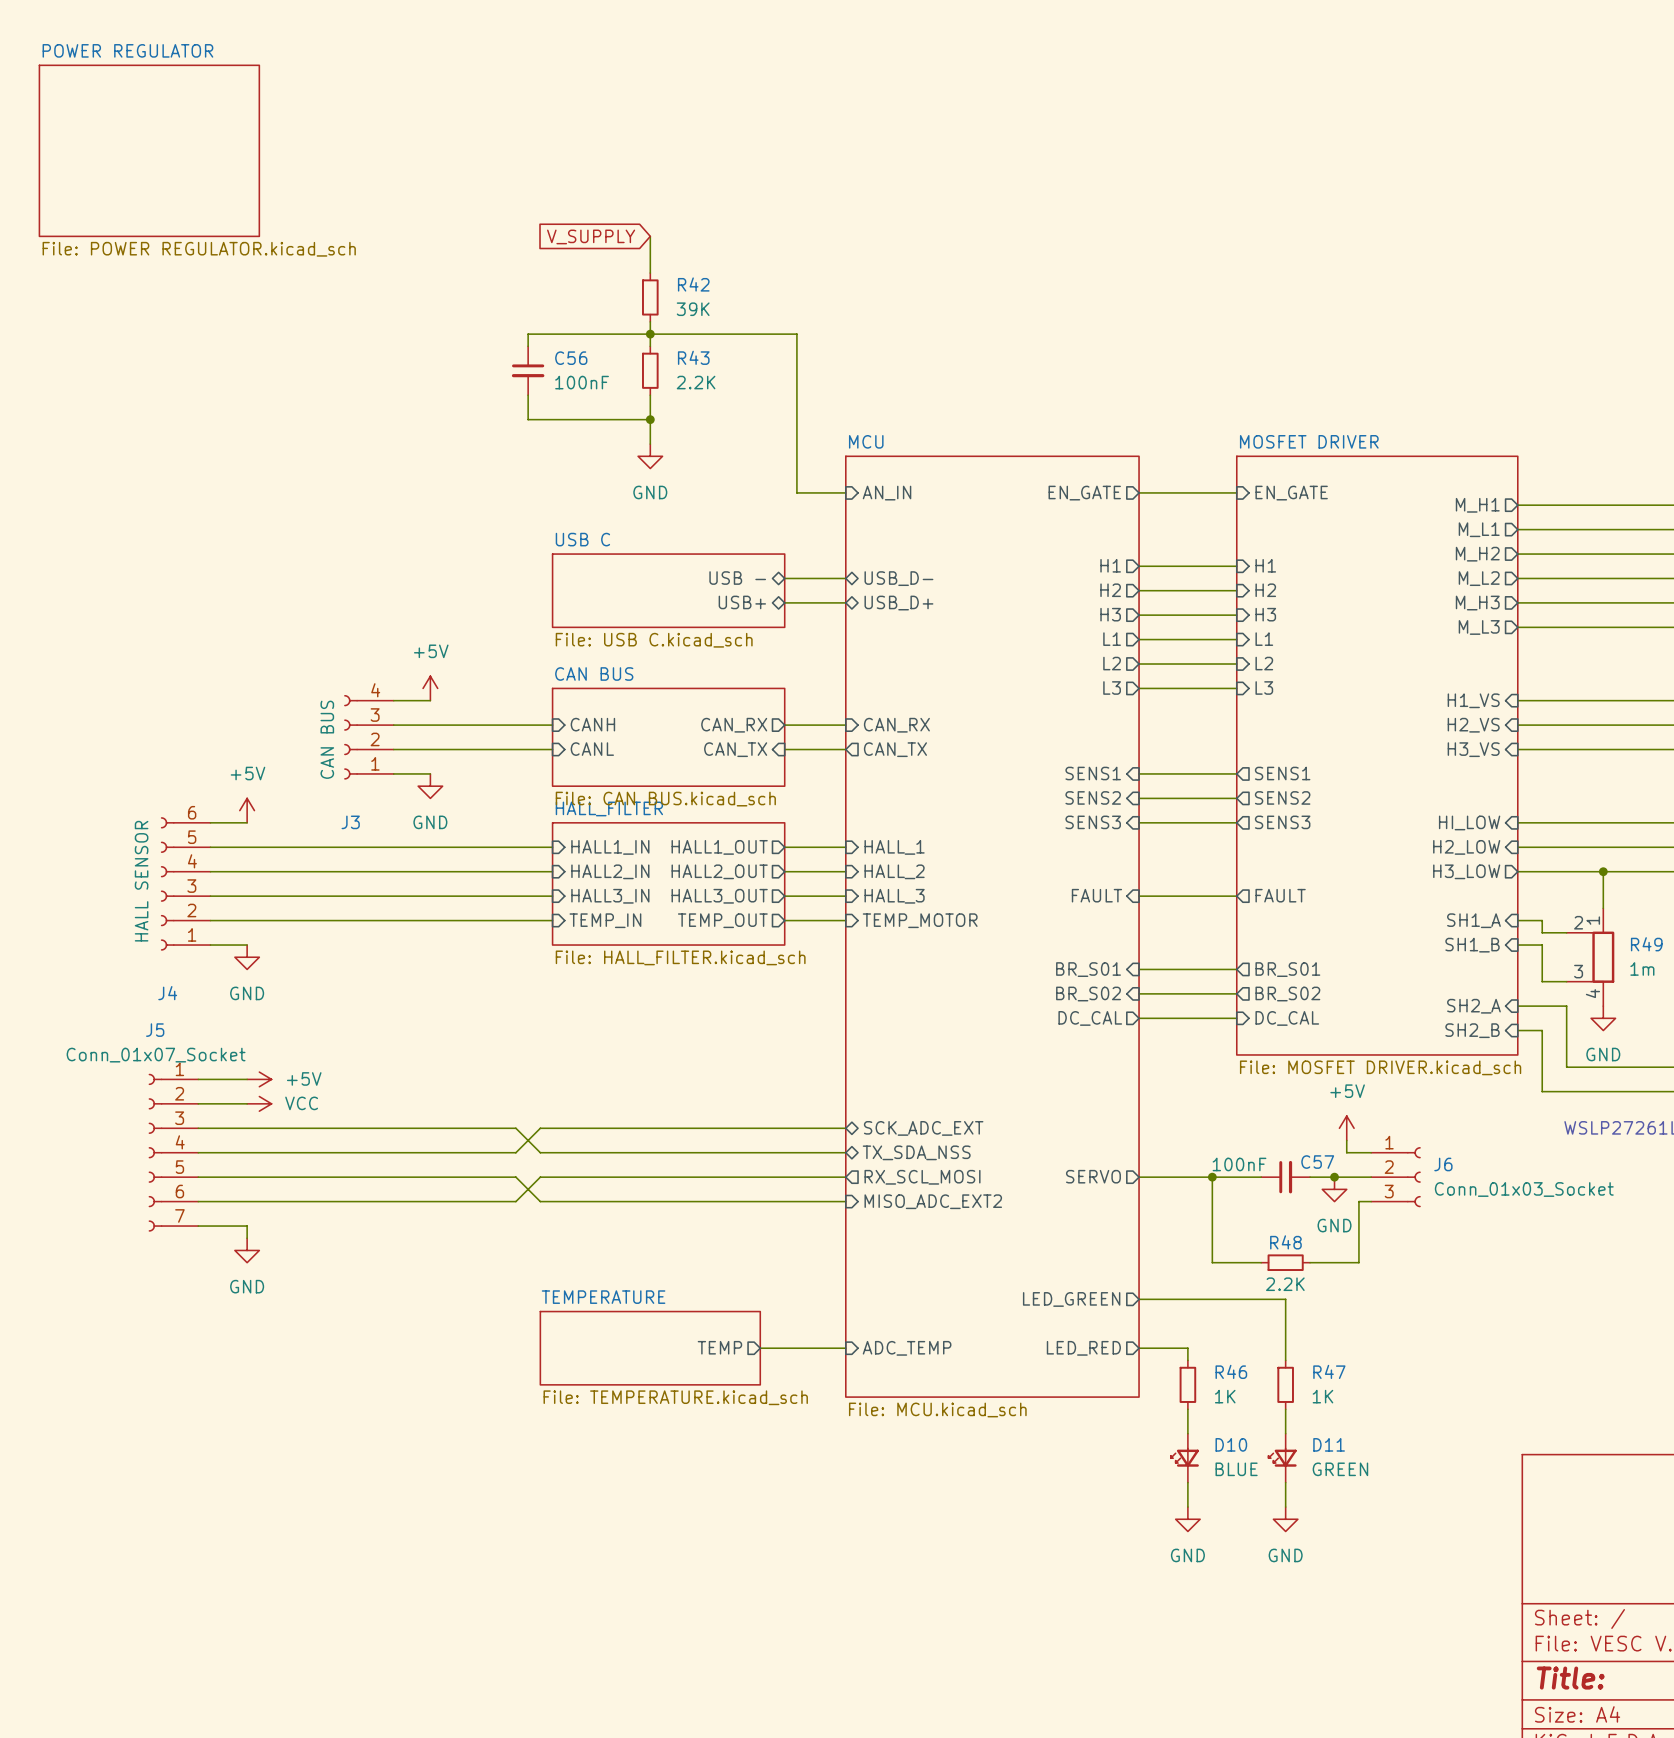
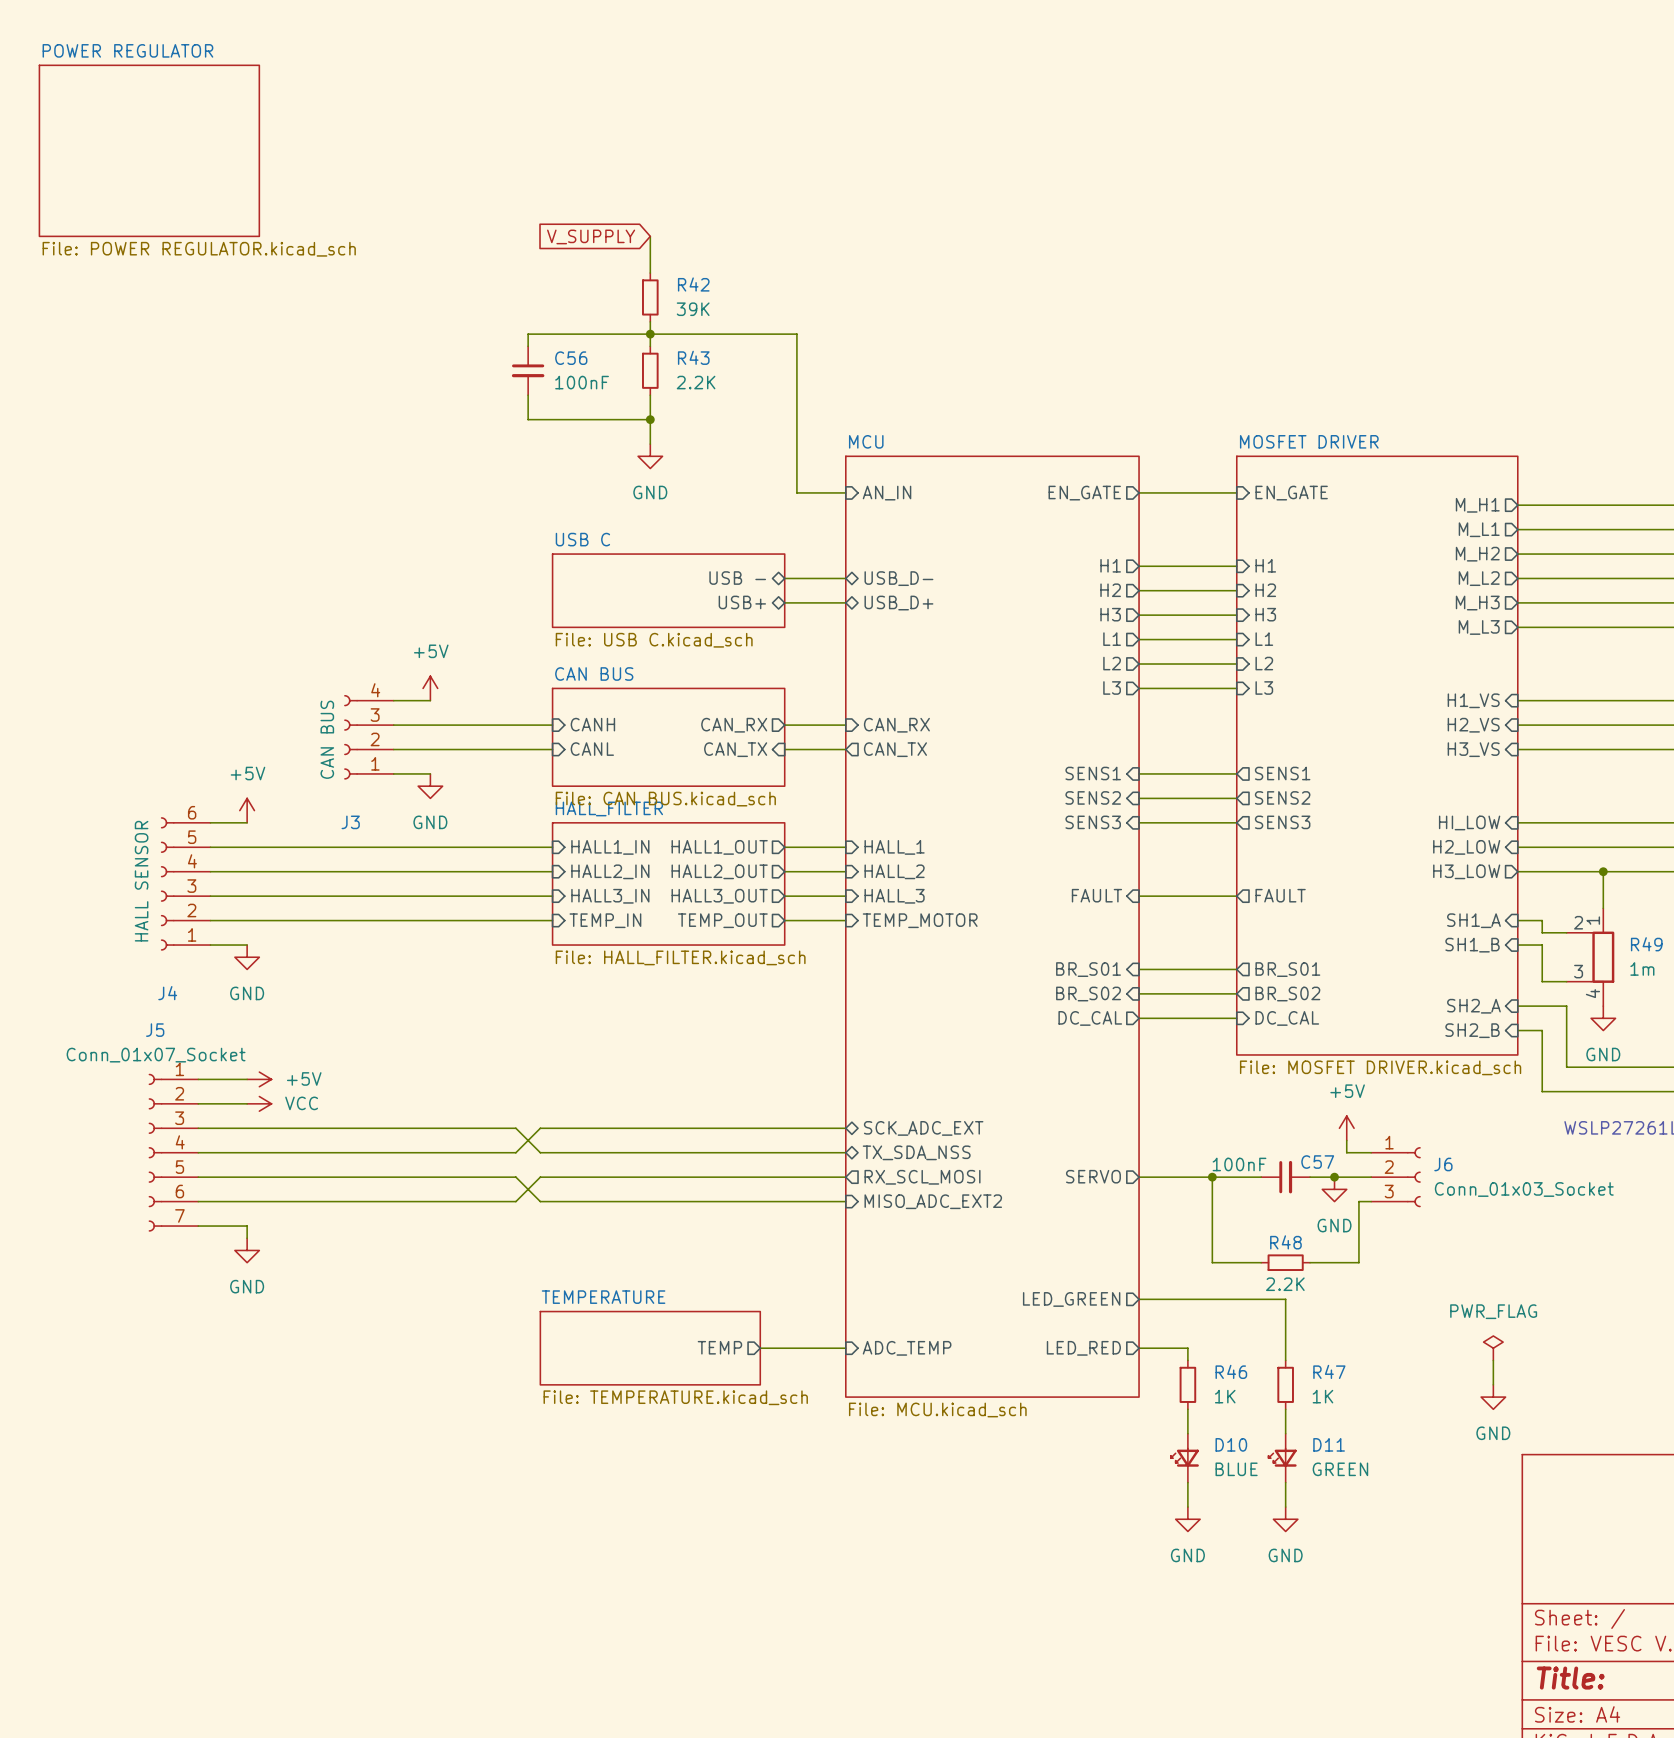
power symbol: none -> PWR_FLAG (1493, 1348)
wire: none -> (1493, 1360) (1493, 1384)
power symbol: none -> GND (1493, 1397)

